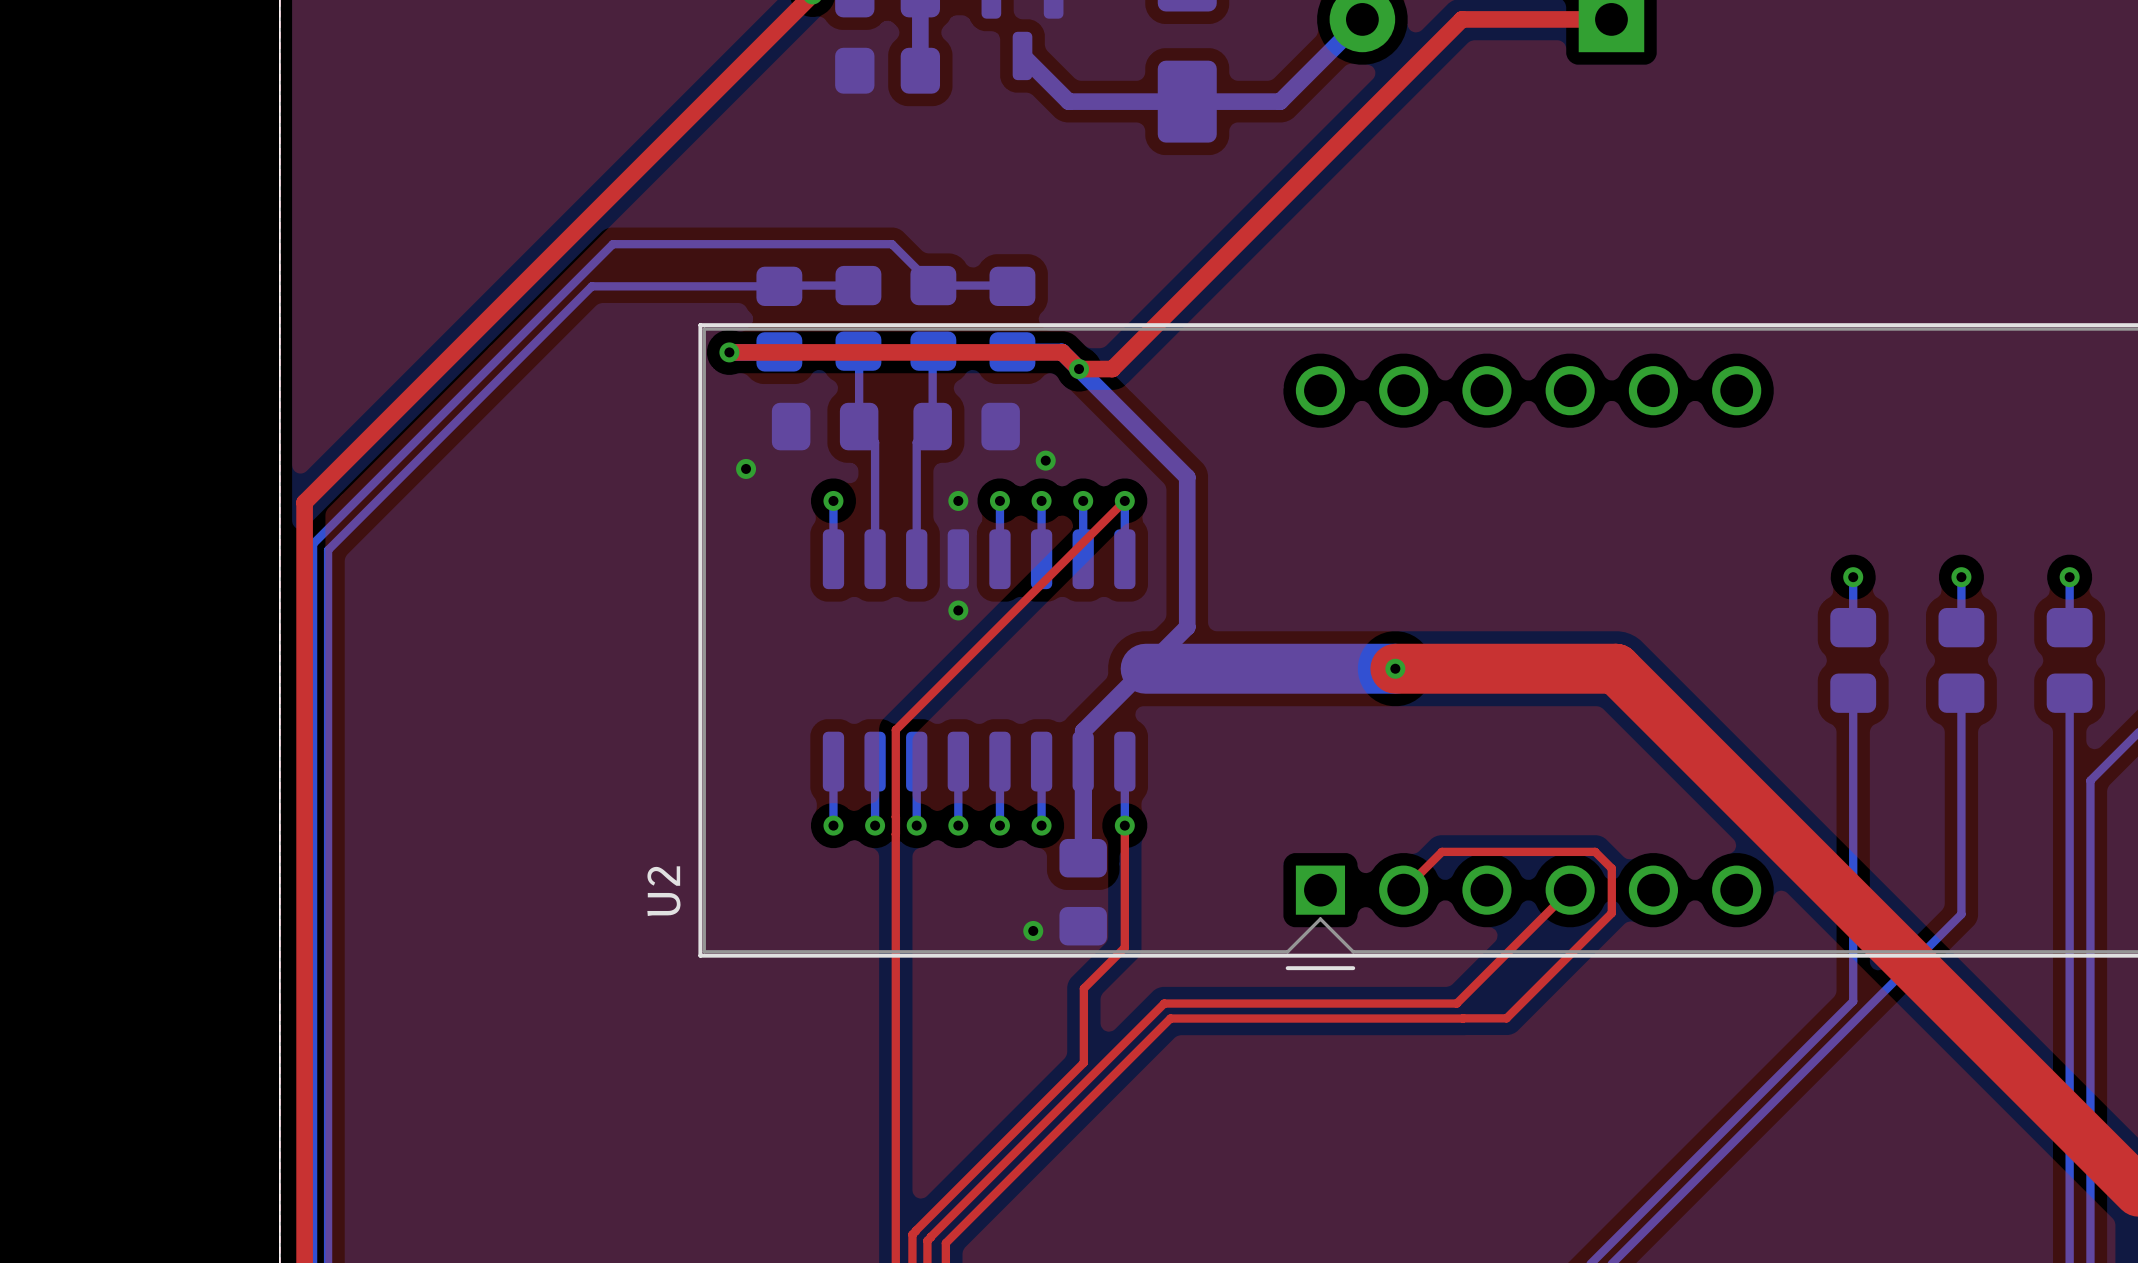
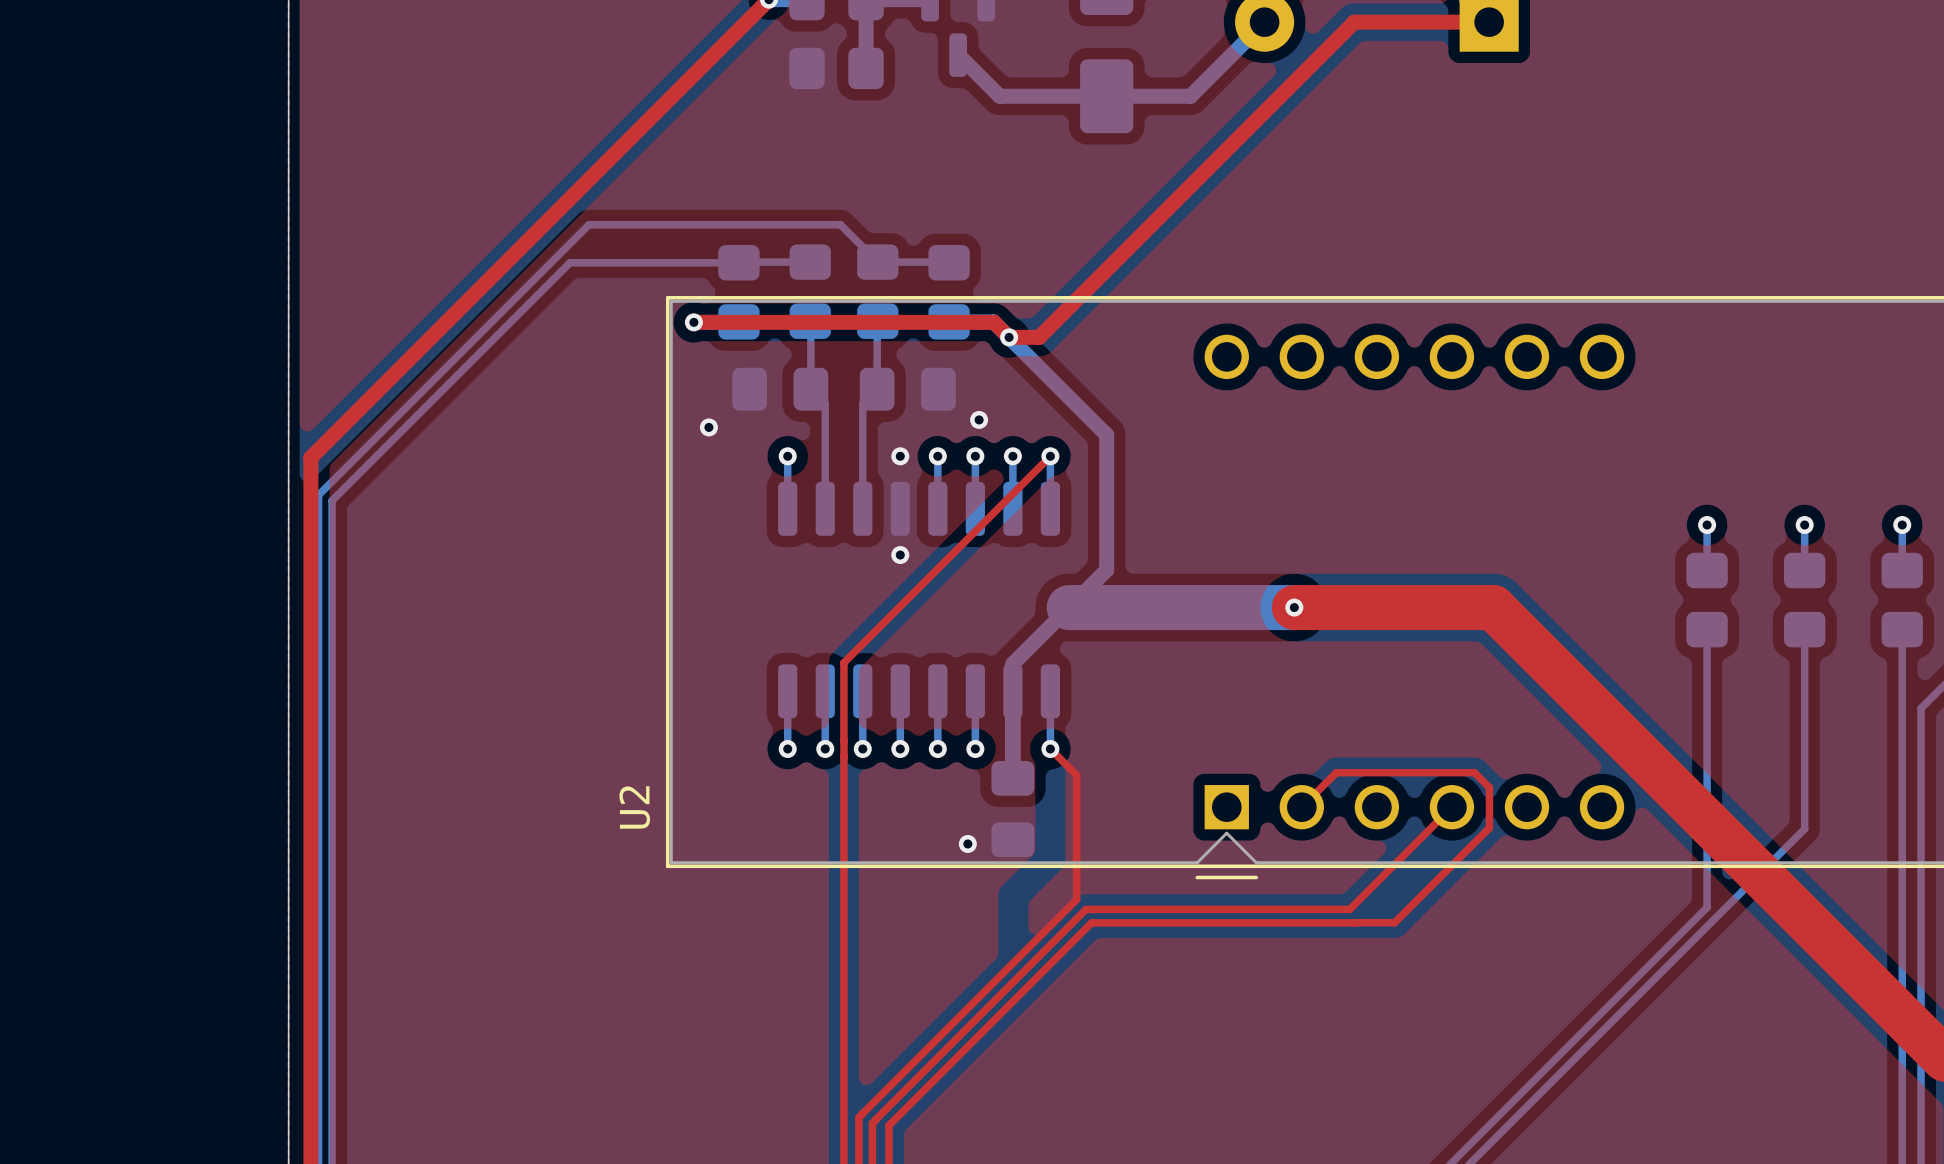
top track: (1124, 825) (1124, 947) (1083, 988) (1083, 1062) -> (1050, 748) (1076, 775) (1076, 899) (1013, 962)

